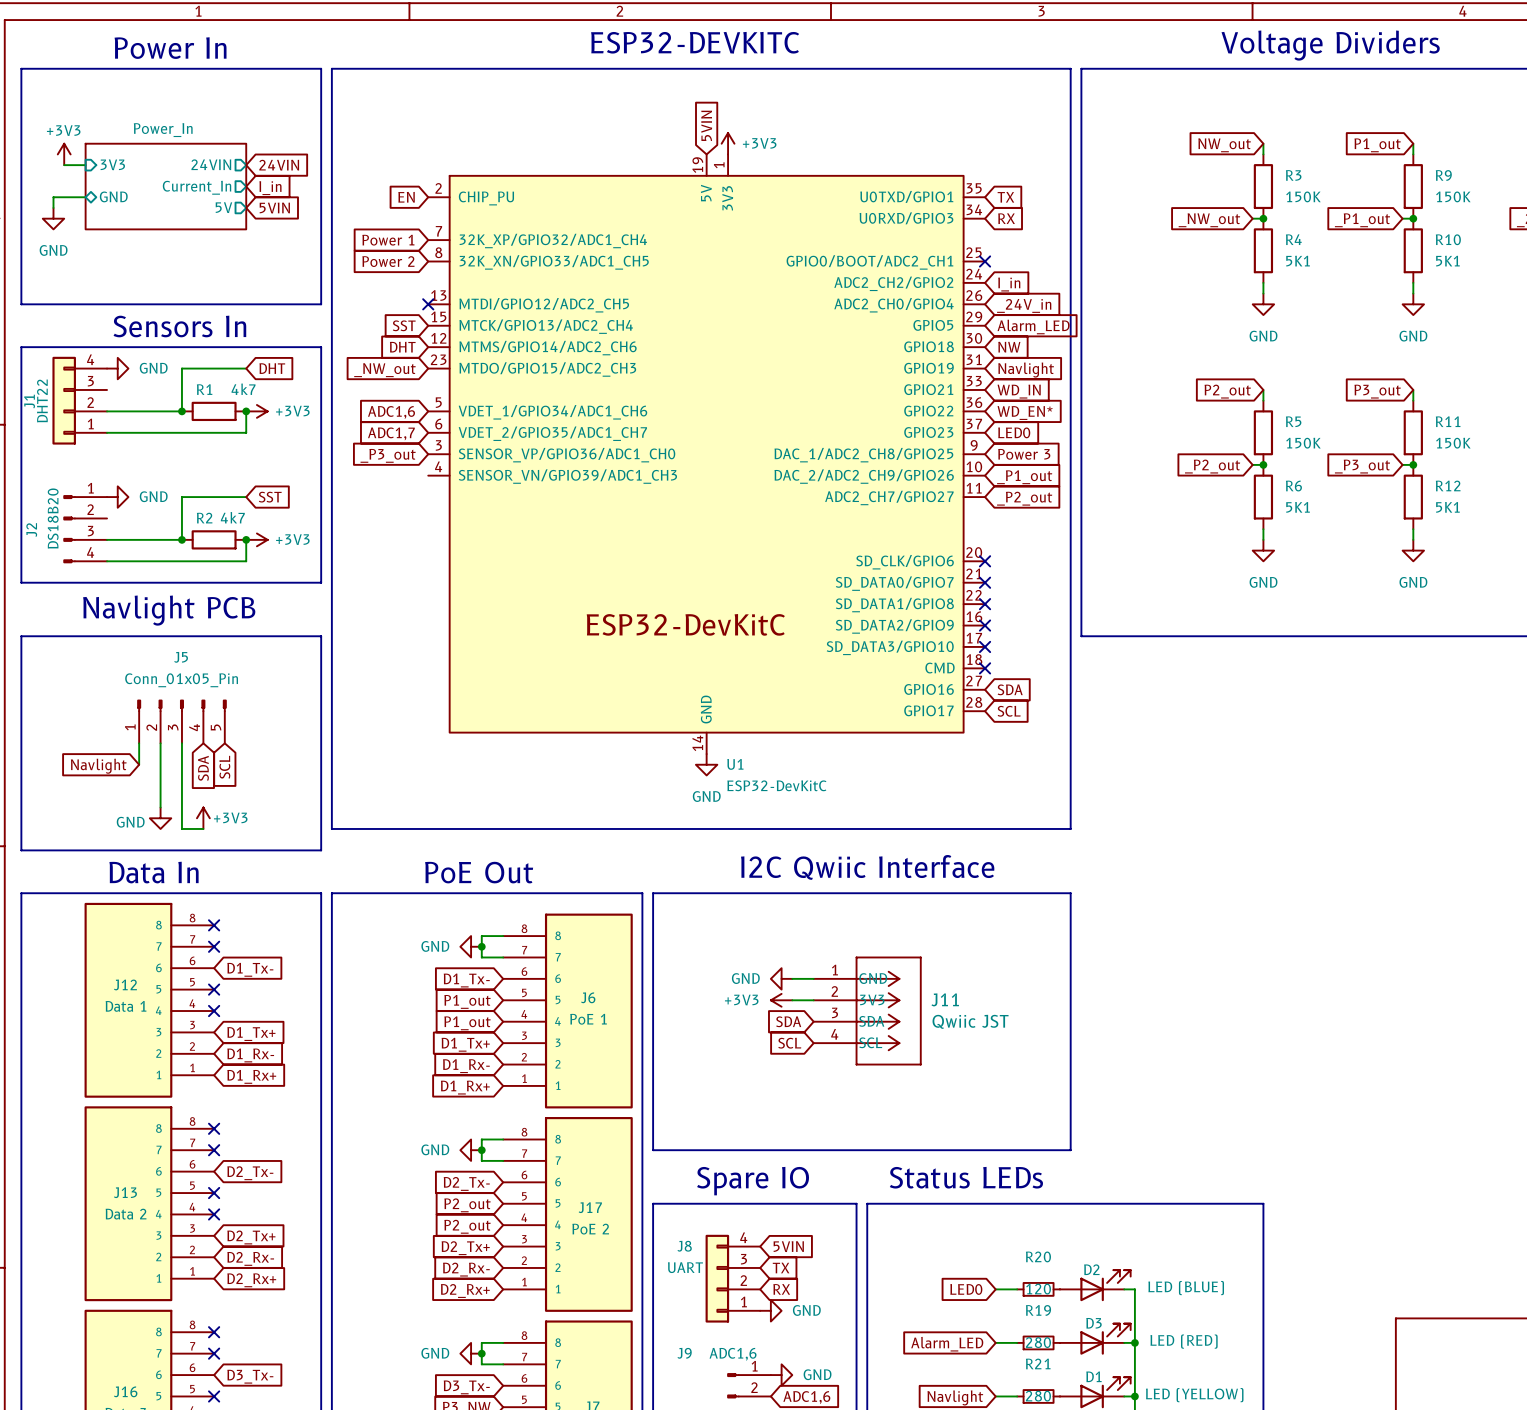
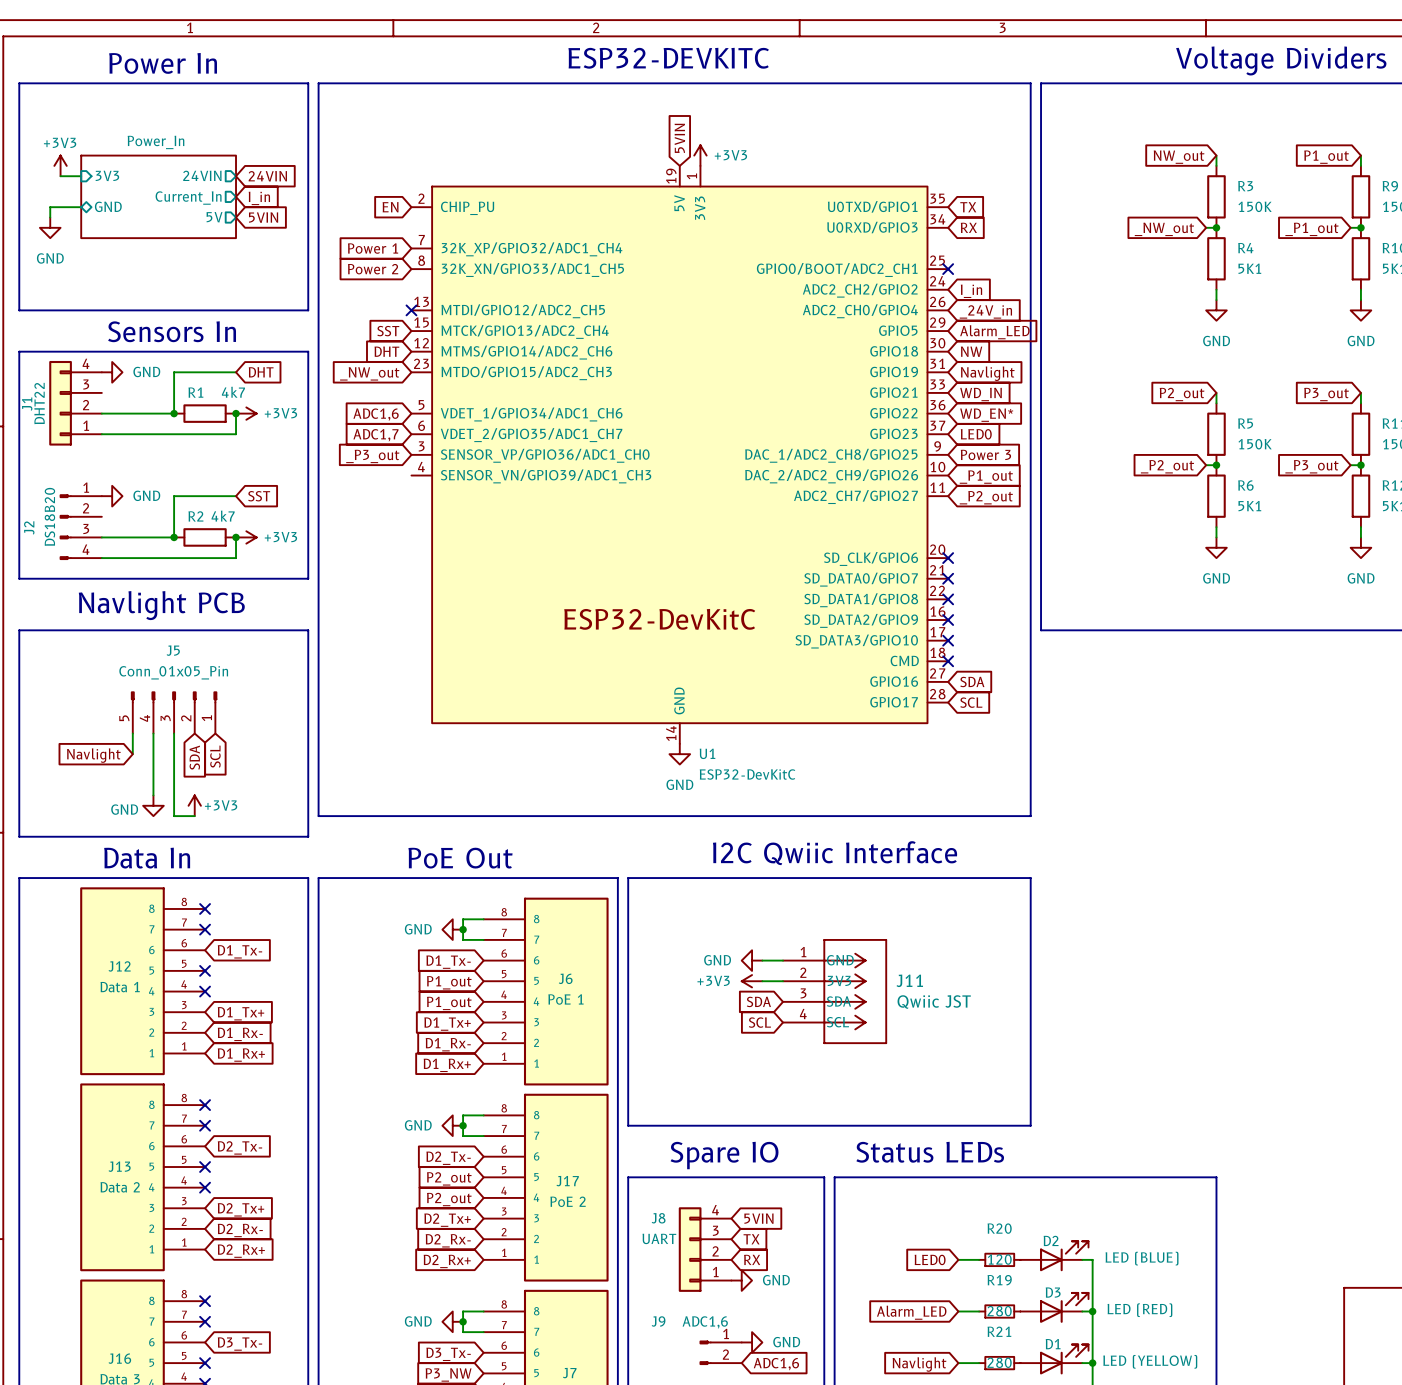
J5 flip: as is (181, 705) -> left-right (174, 697)

